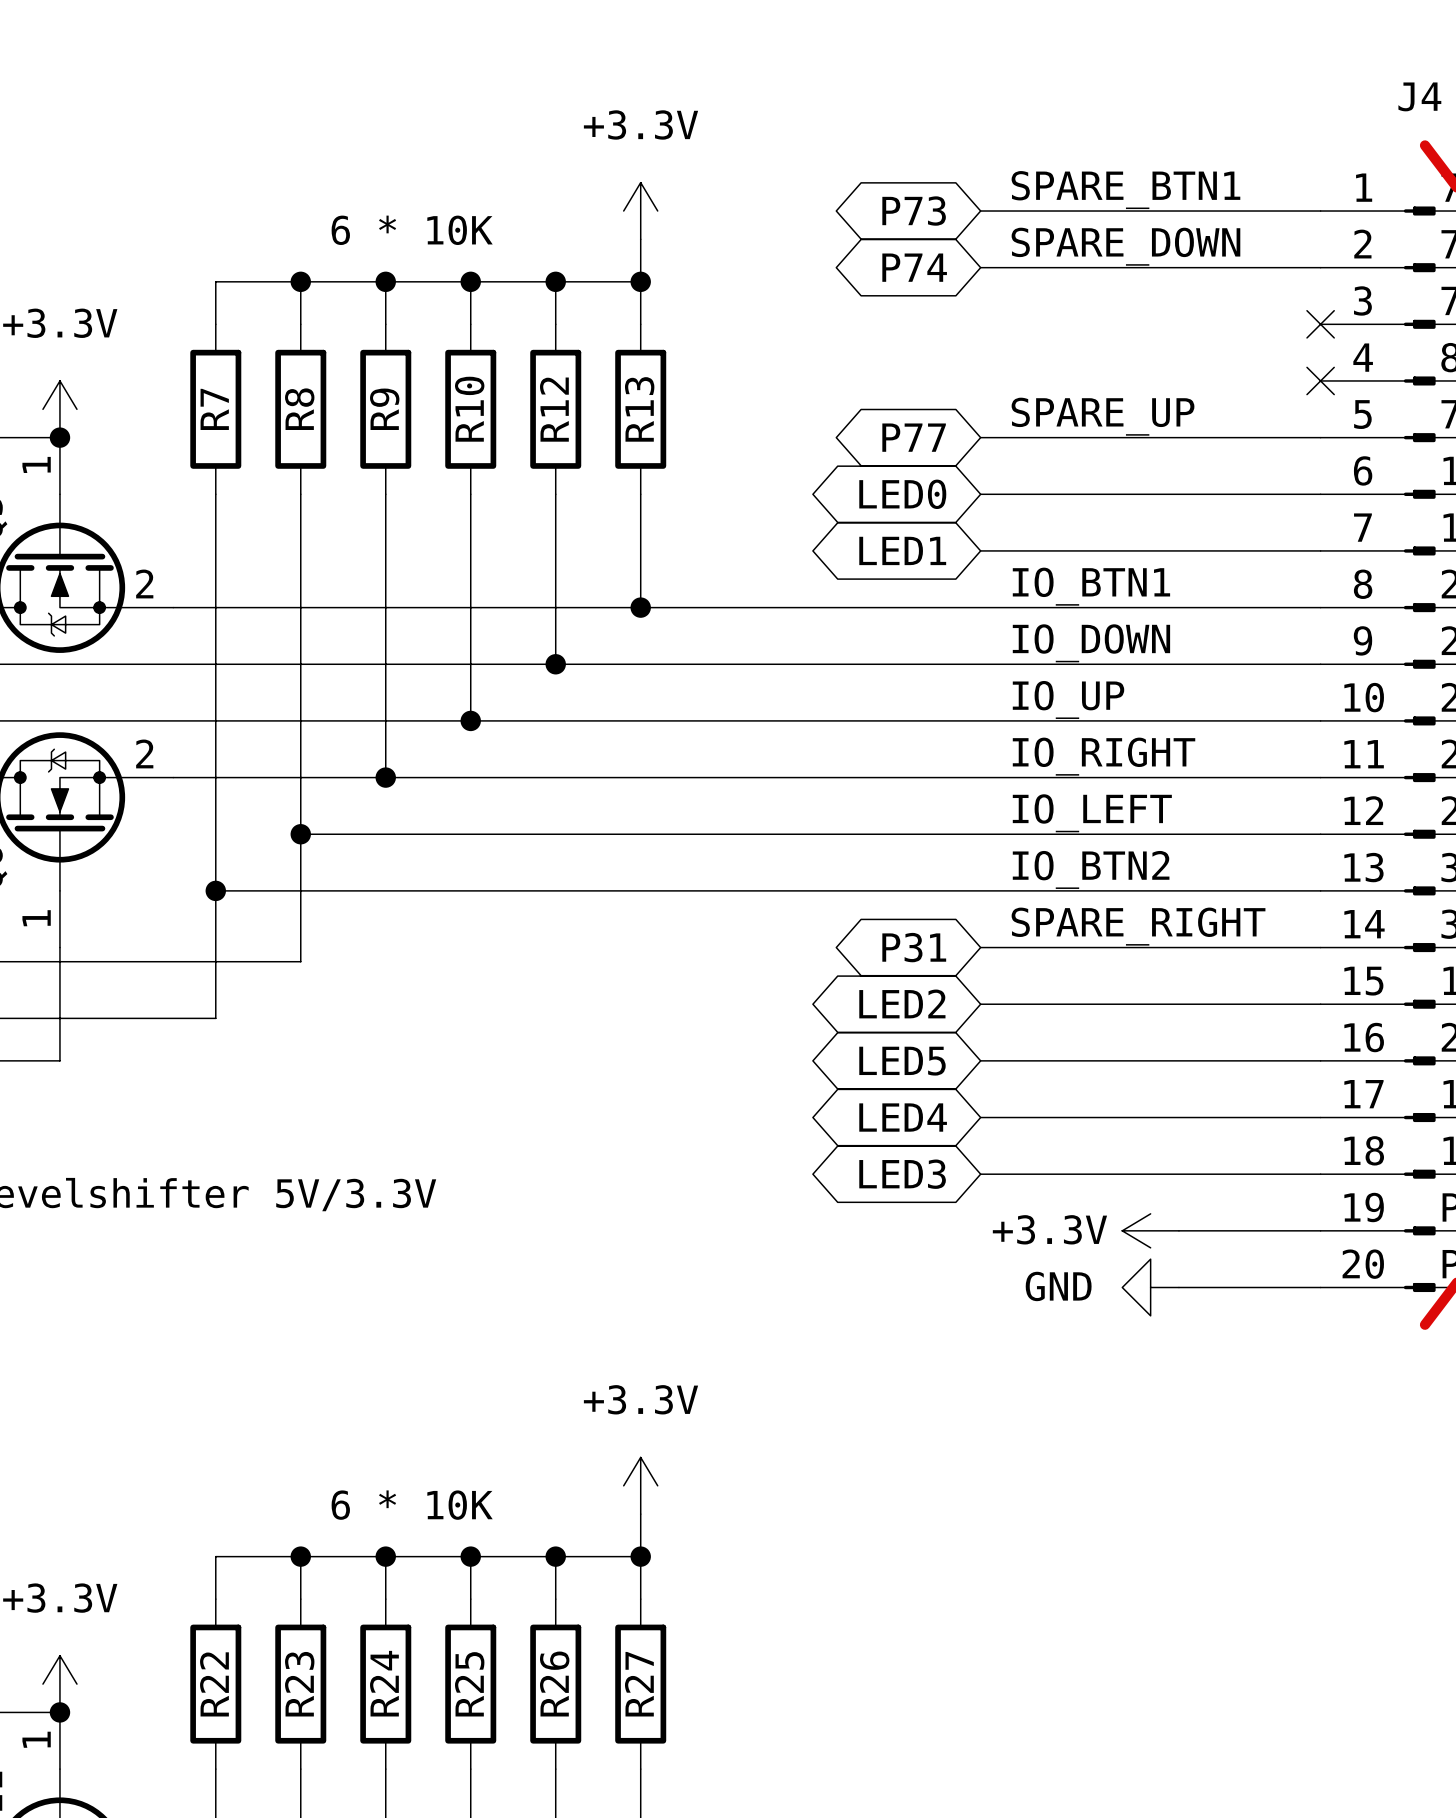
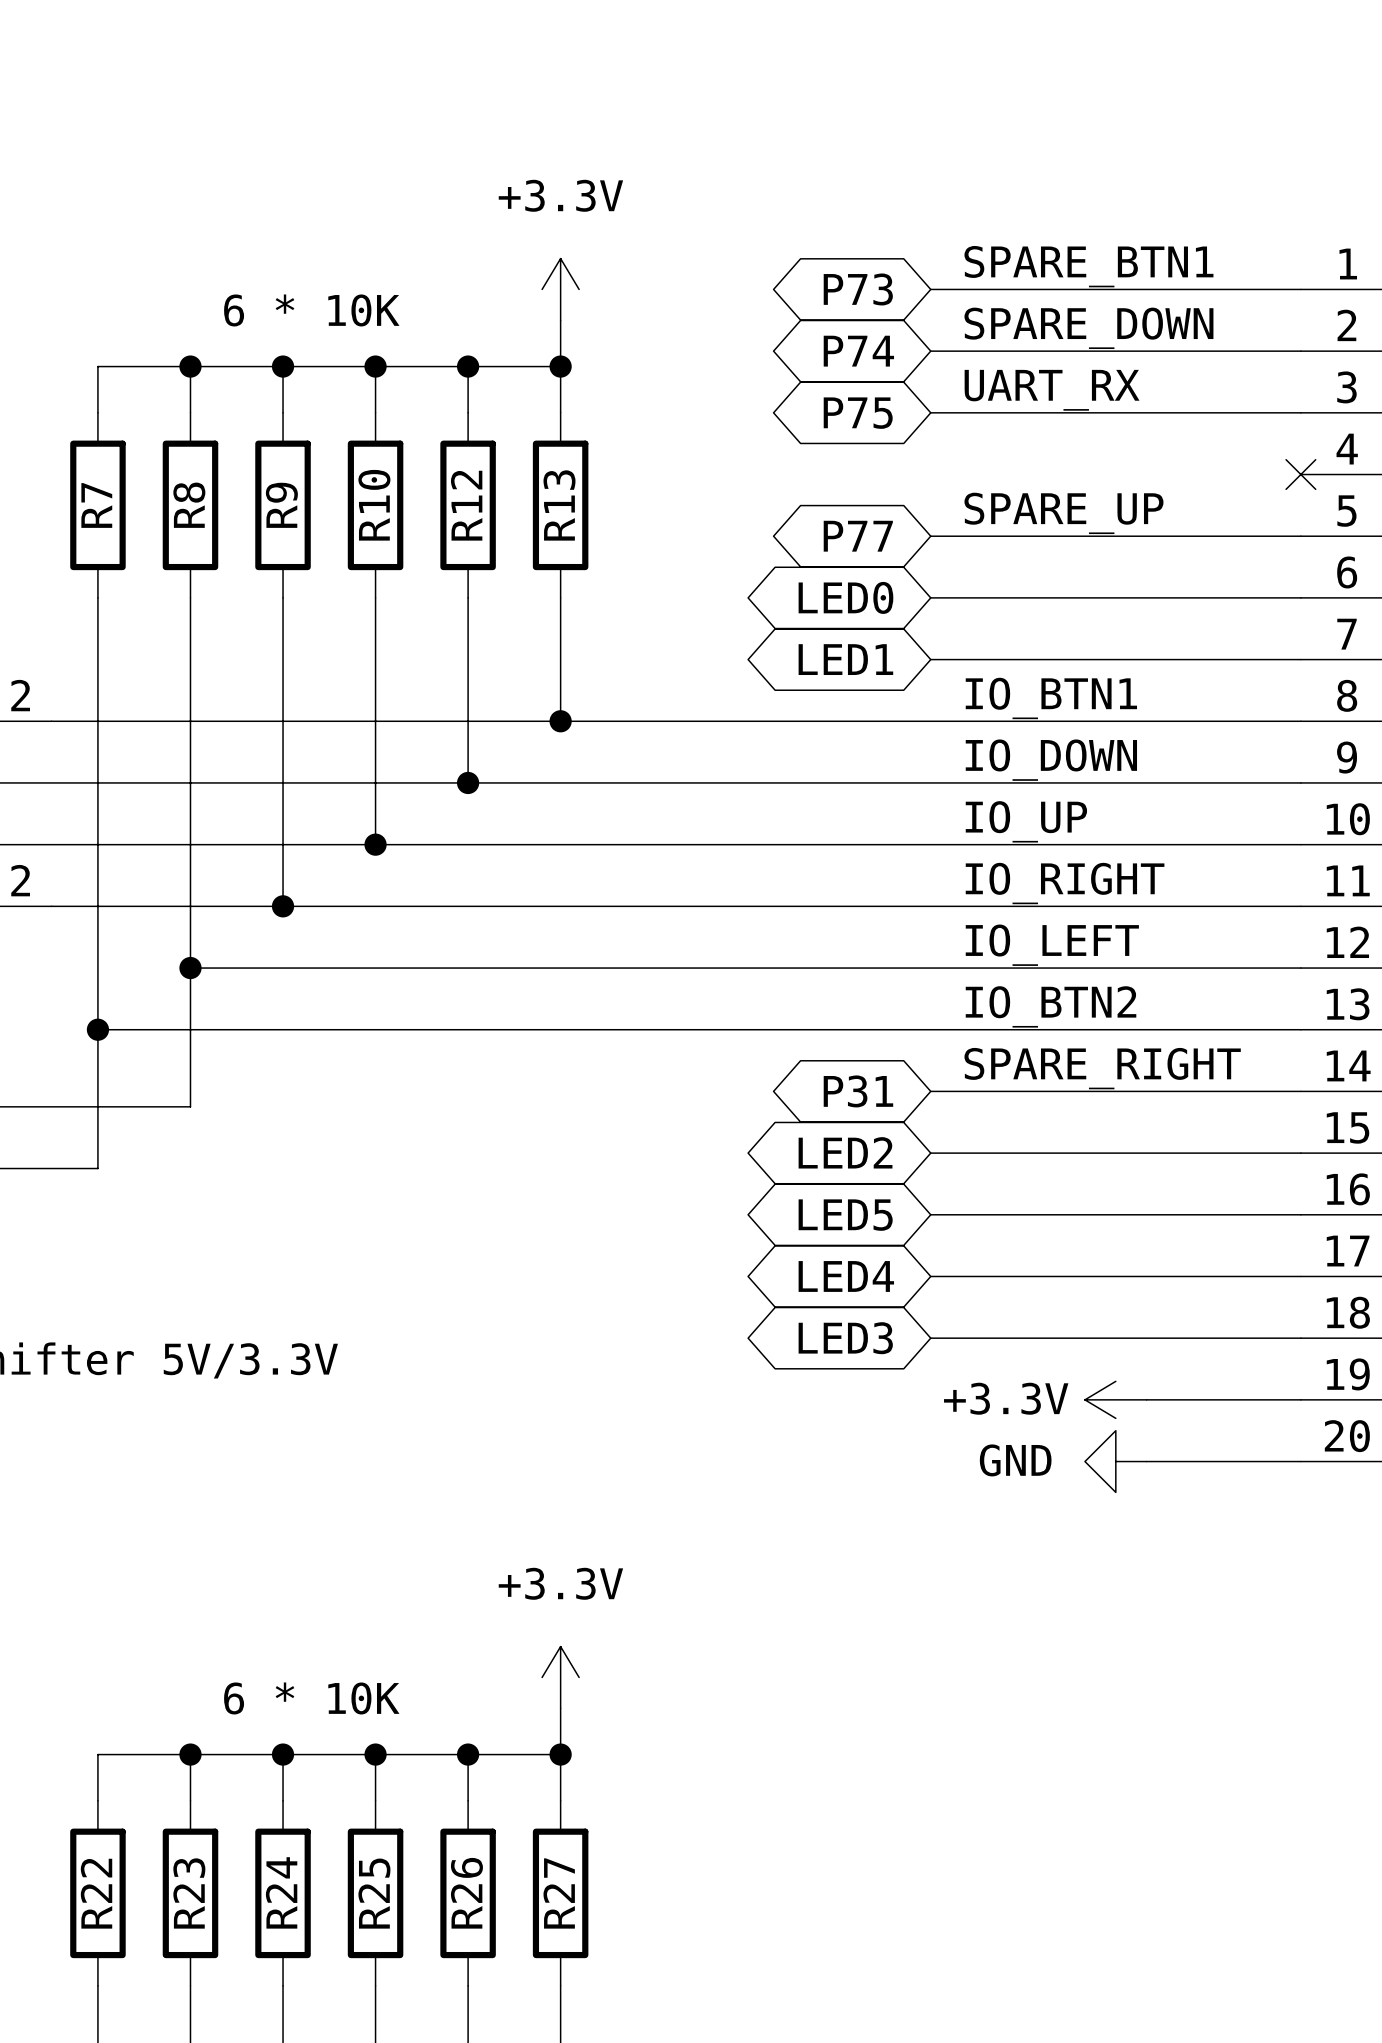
label: none -> UART_RX (1052, 390)
global label: none -> P75 (858, 413)
wire: none -> (930, 412) (1300, 412)
no-connect mark: (1320, 324) -> none

